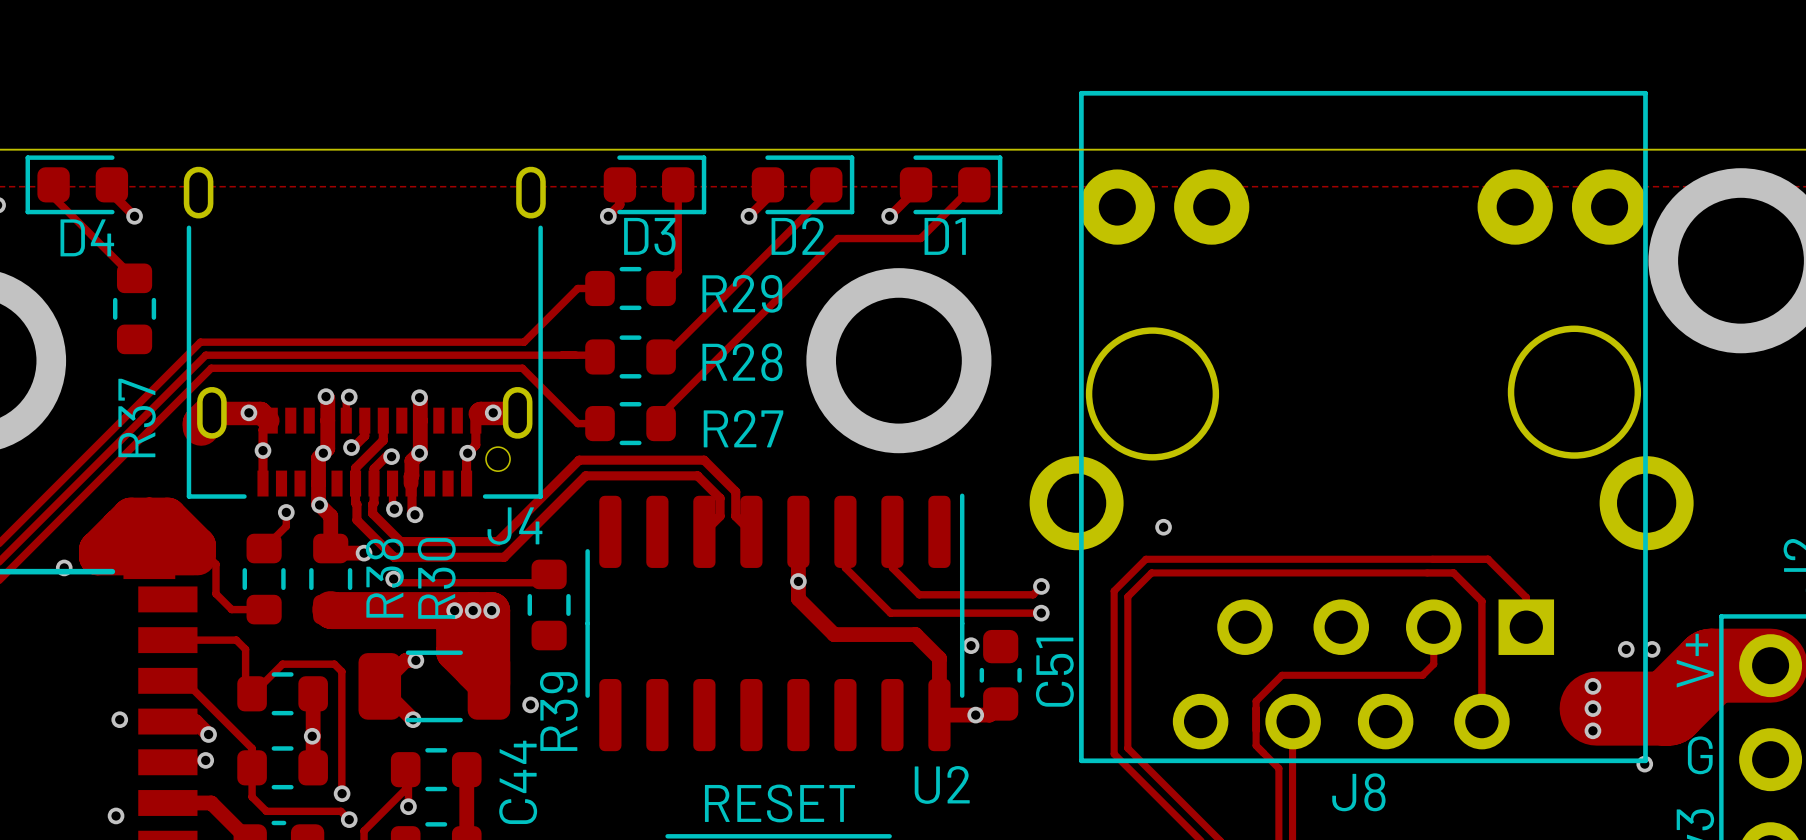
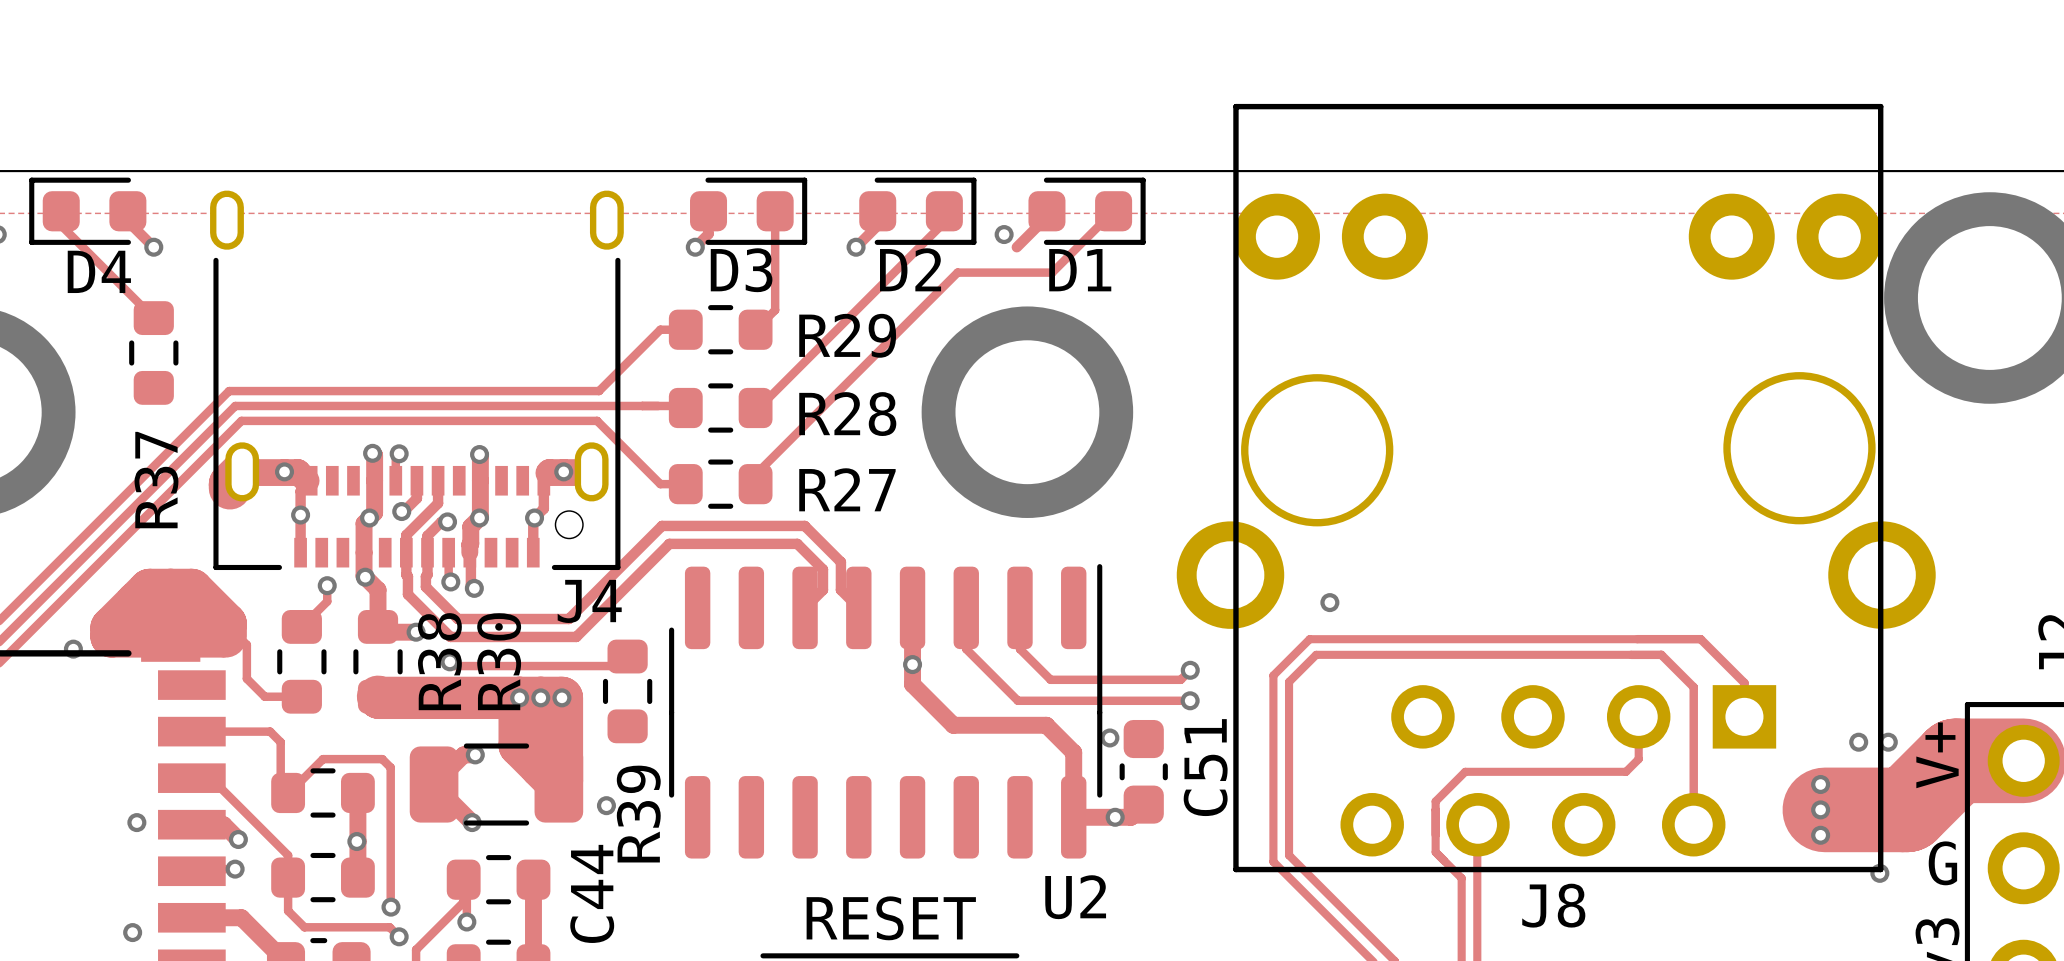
via position: (889, 216) -> (1004, 234)

